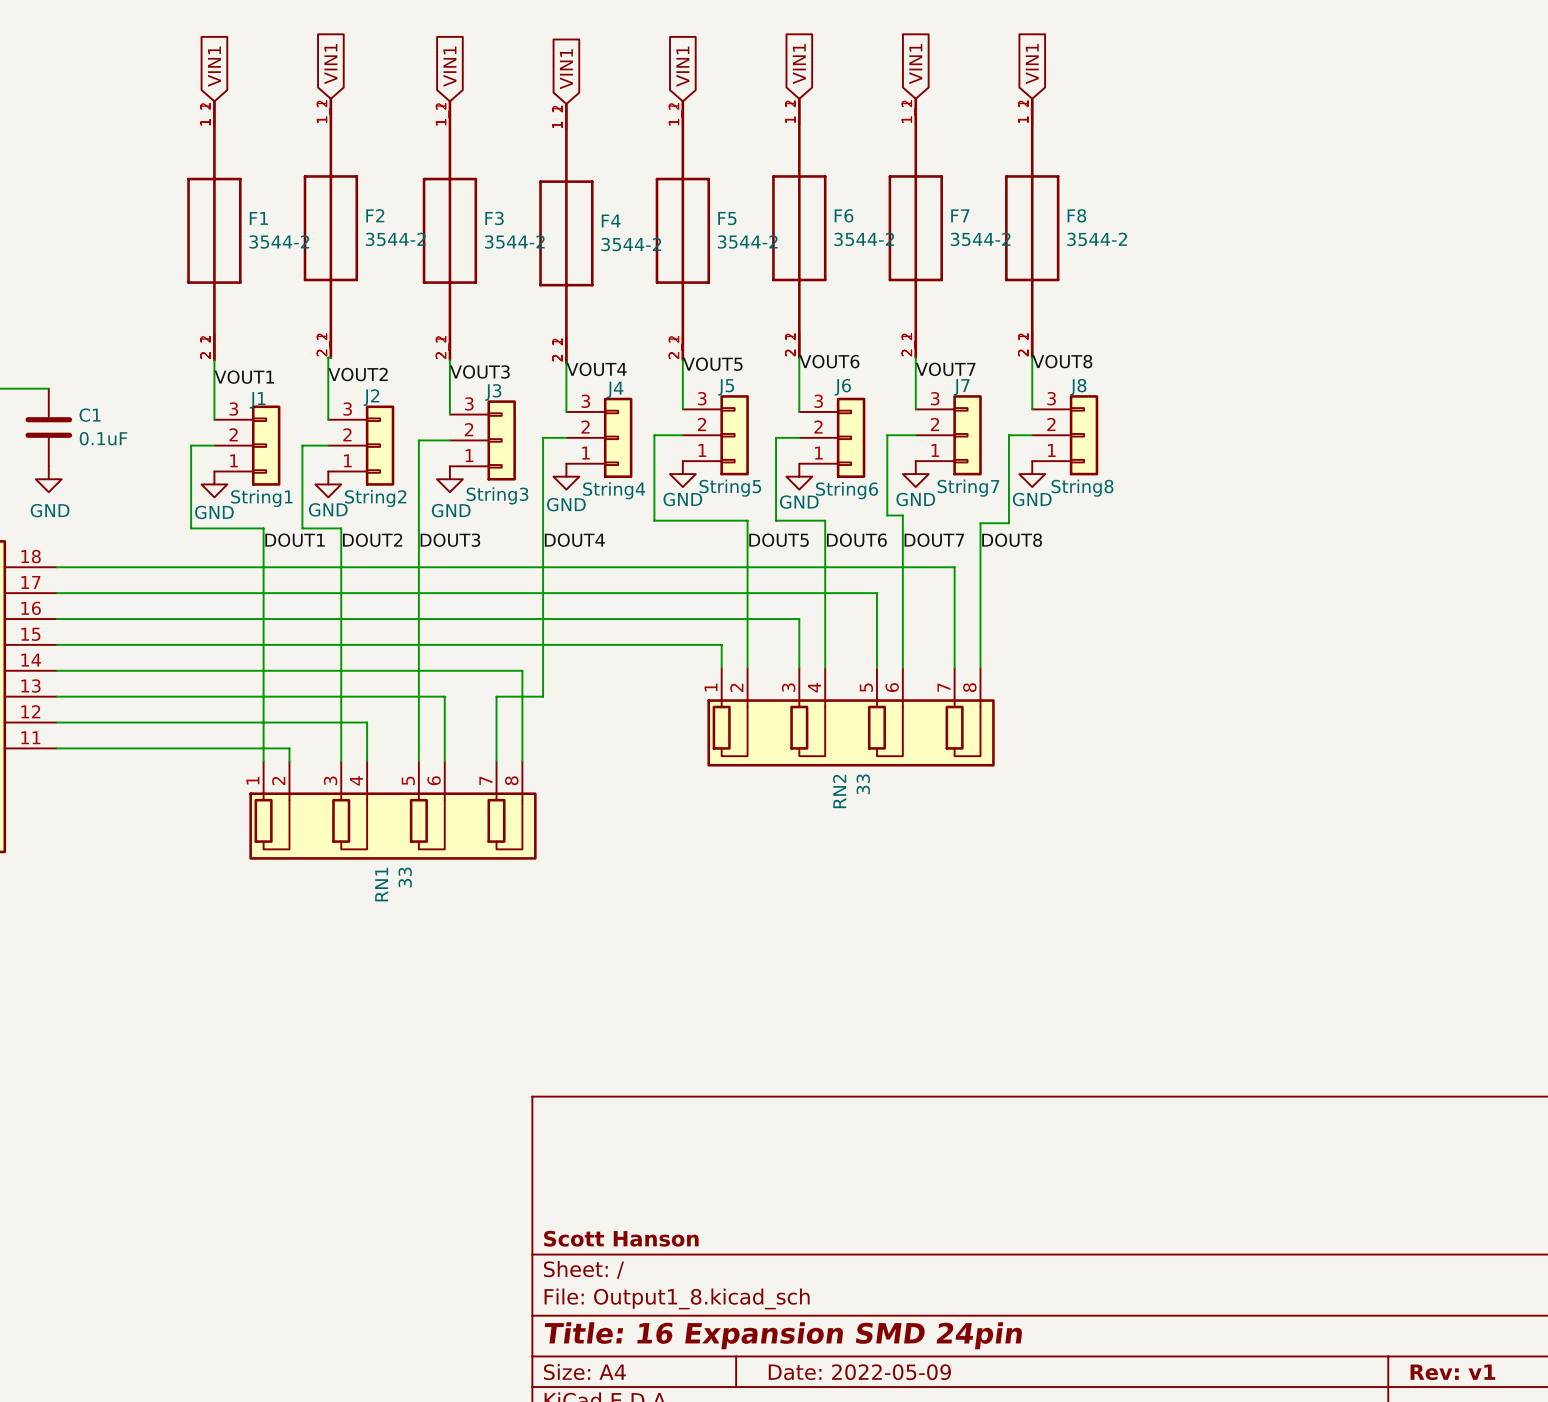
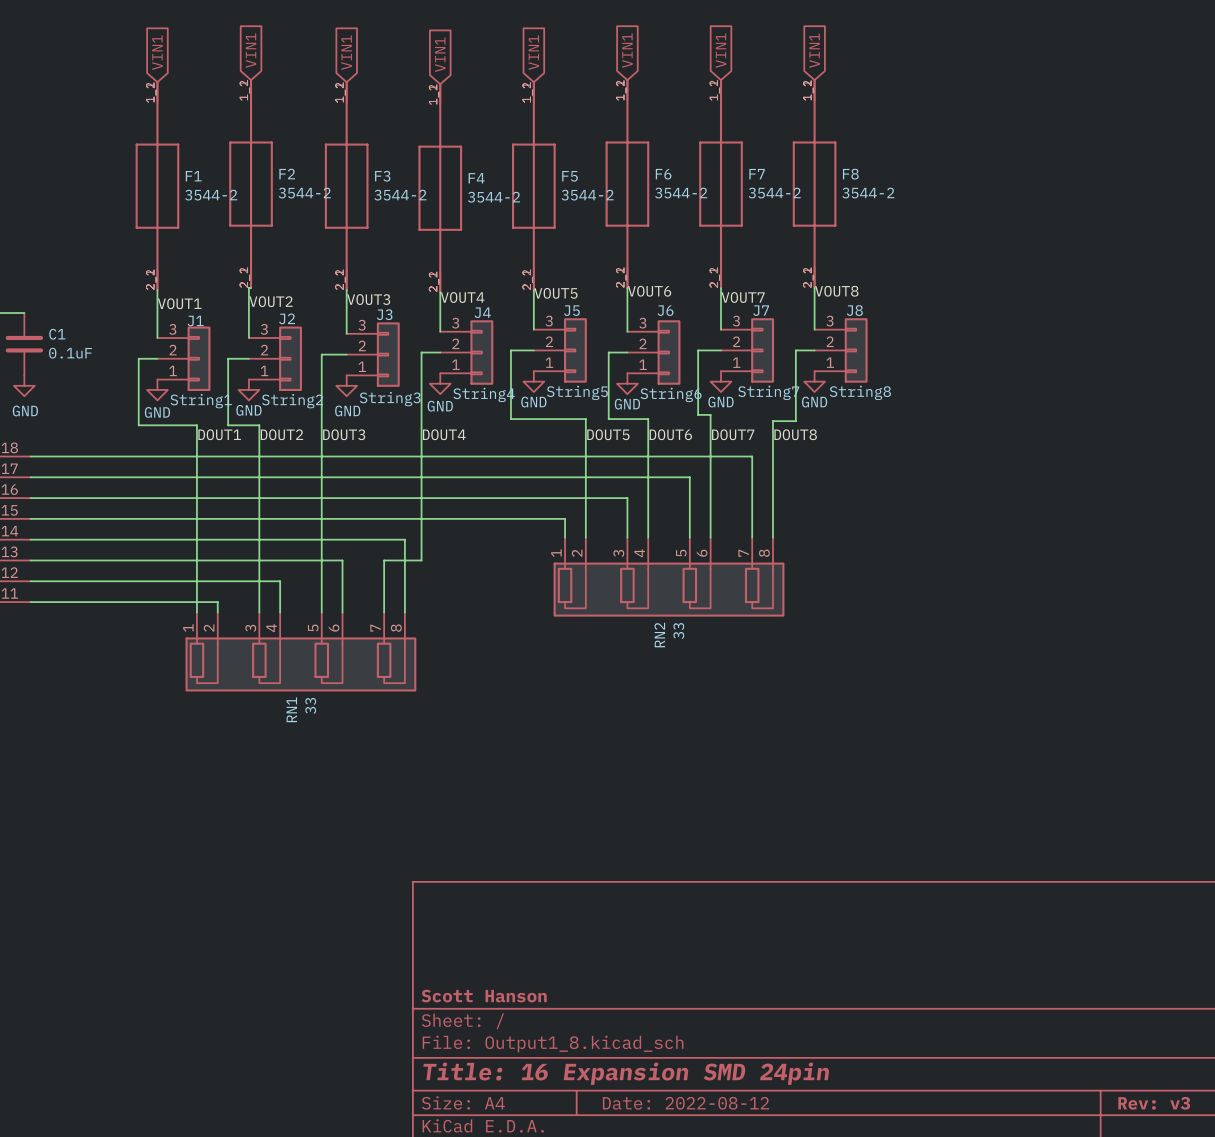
title block: Date: 2022-05-09 (859, 1372) -> Date: 2022-08-12 (685, 1103)
title block: Rev: v1 (1452, 1372) -> Rev: v3 (1154, 1103)

